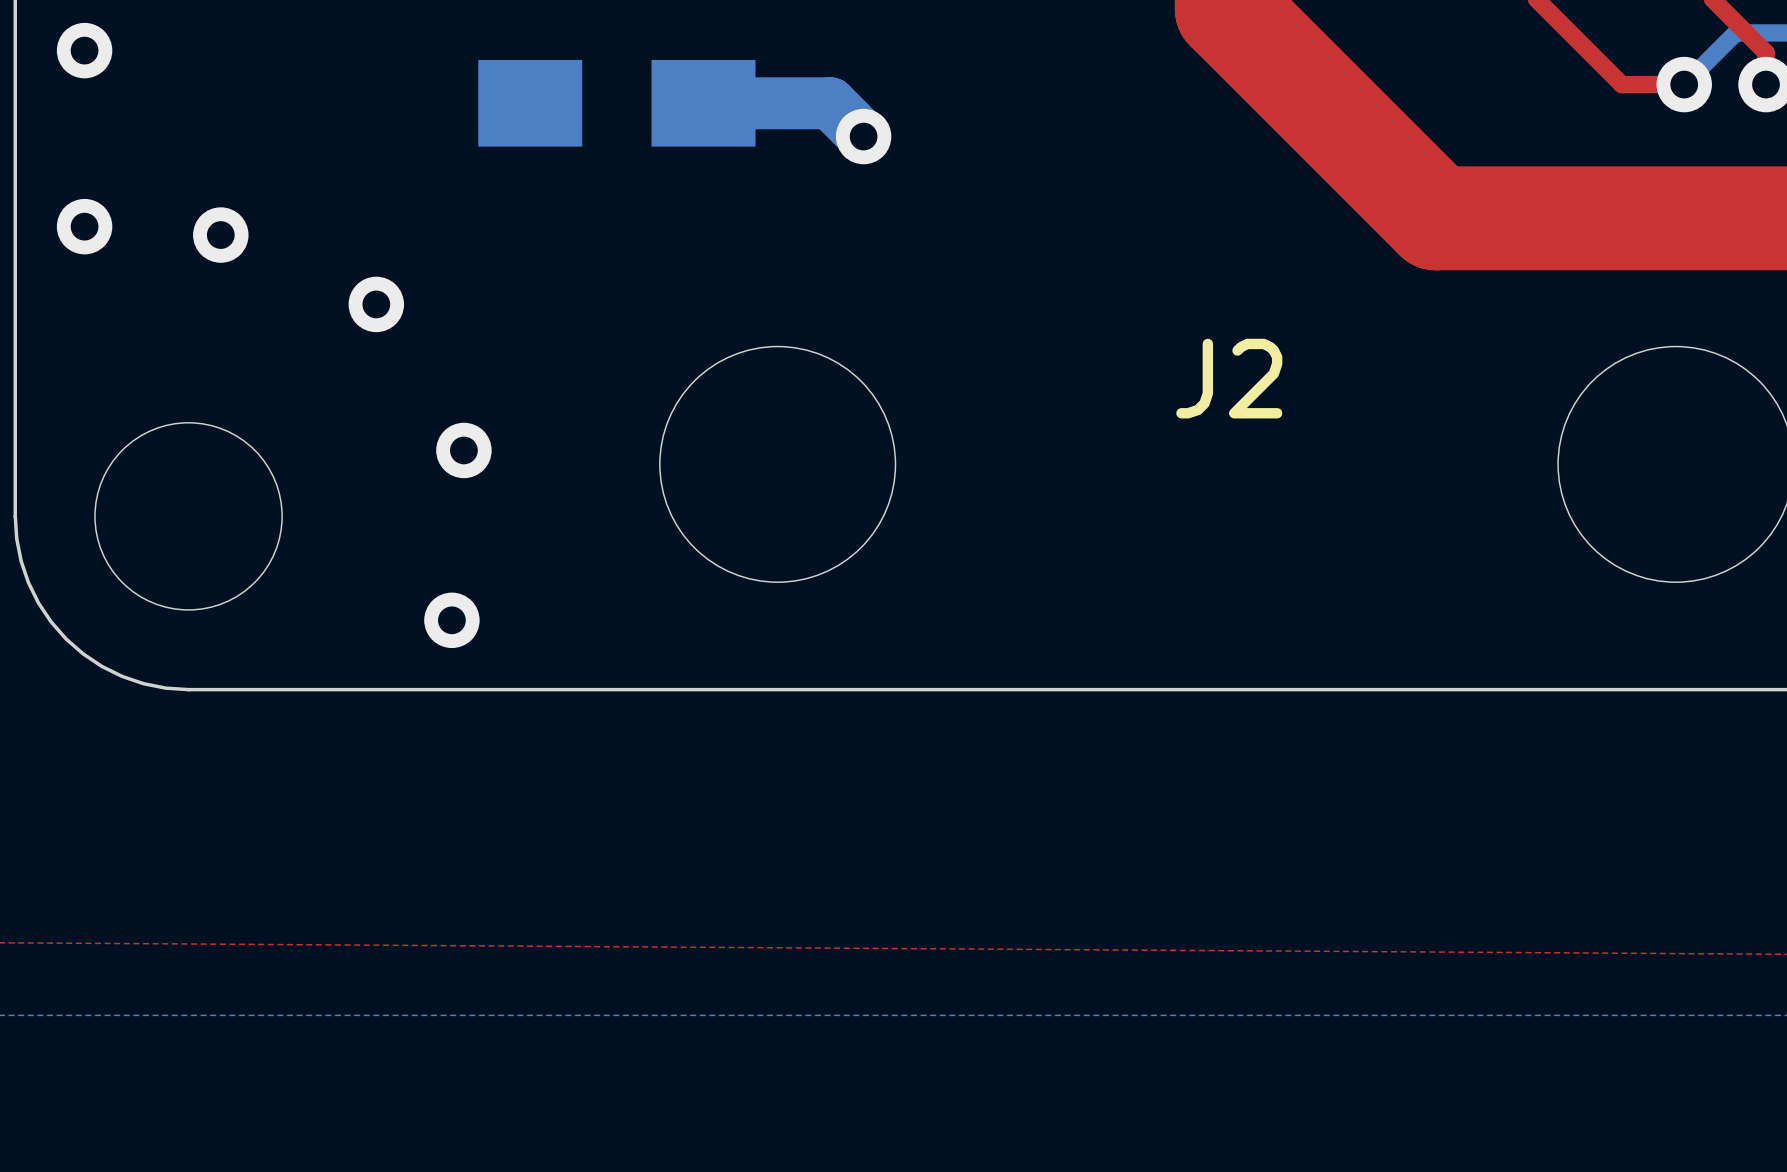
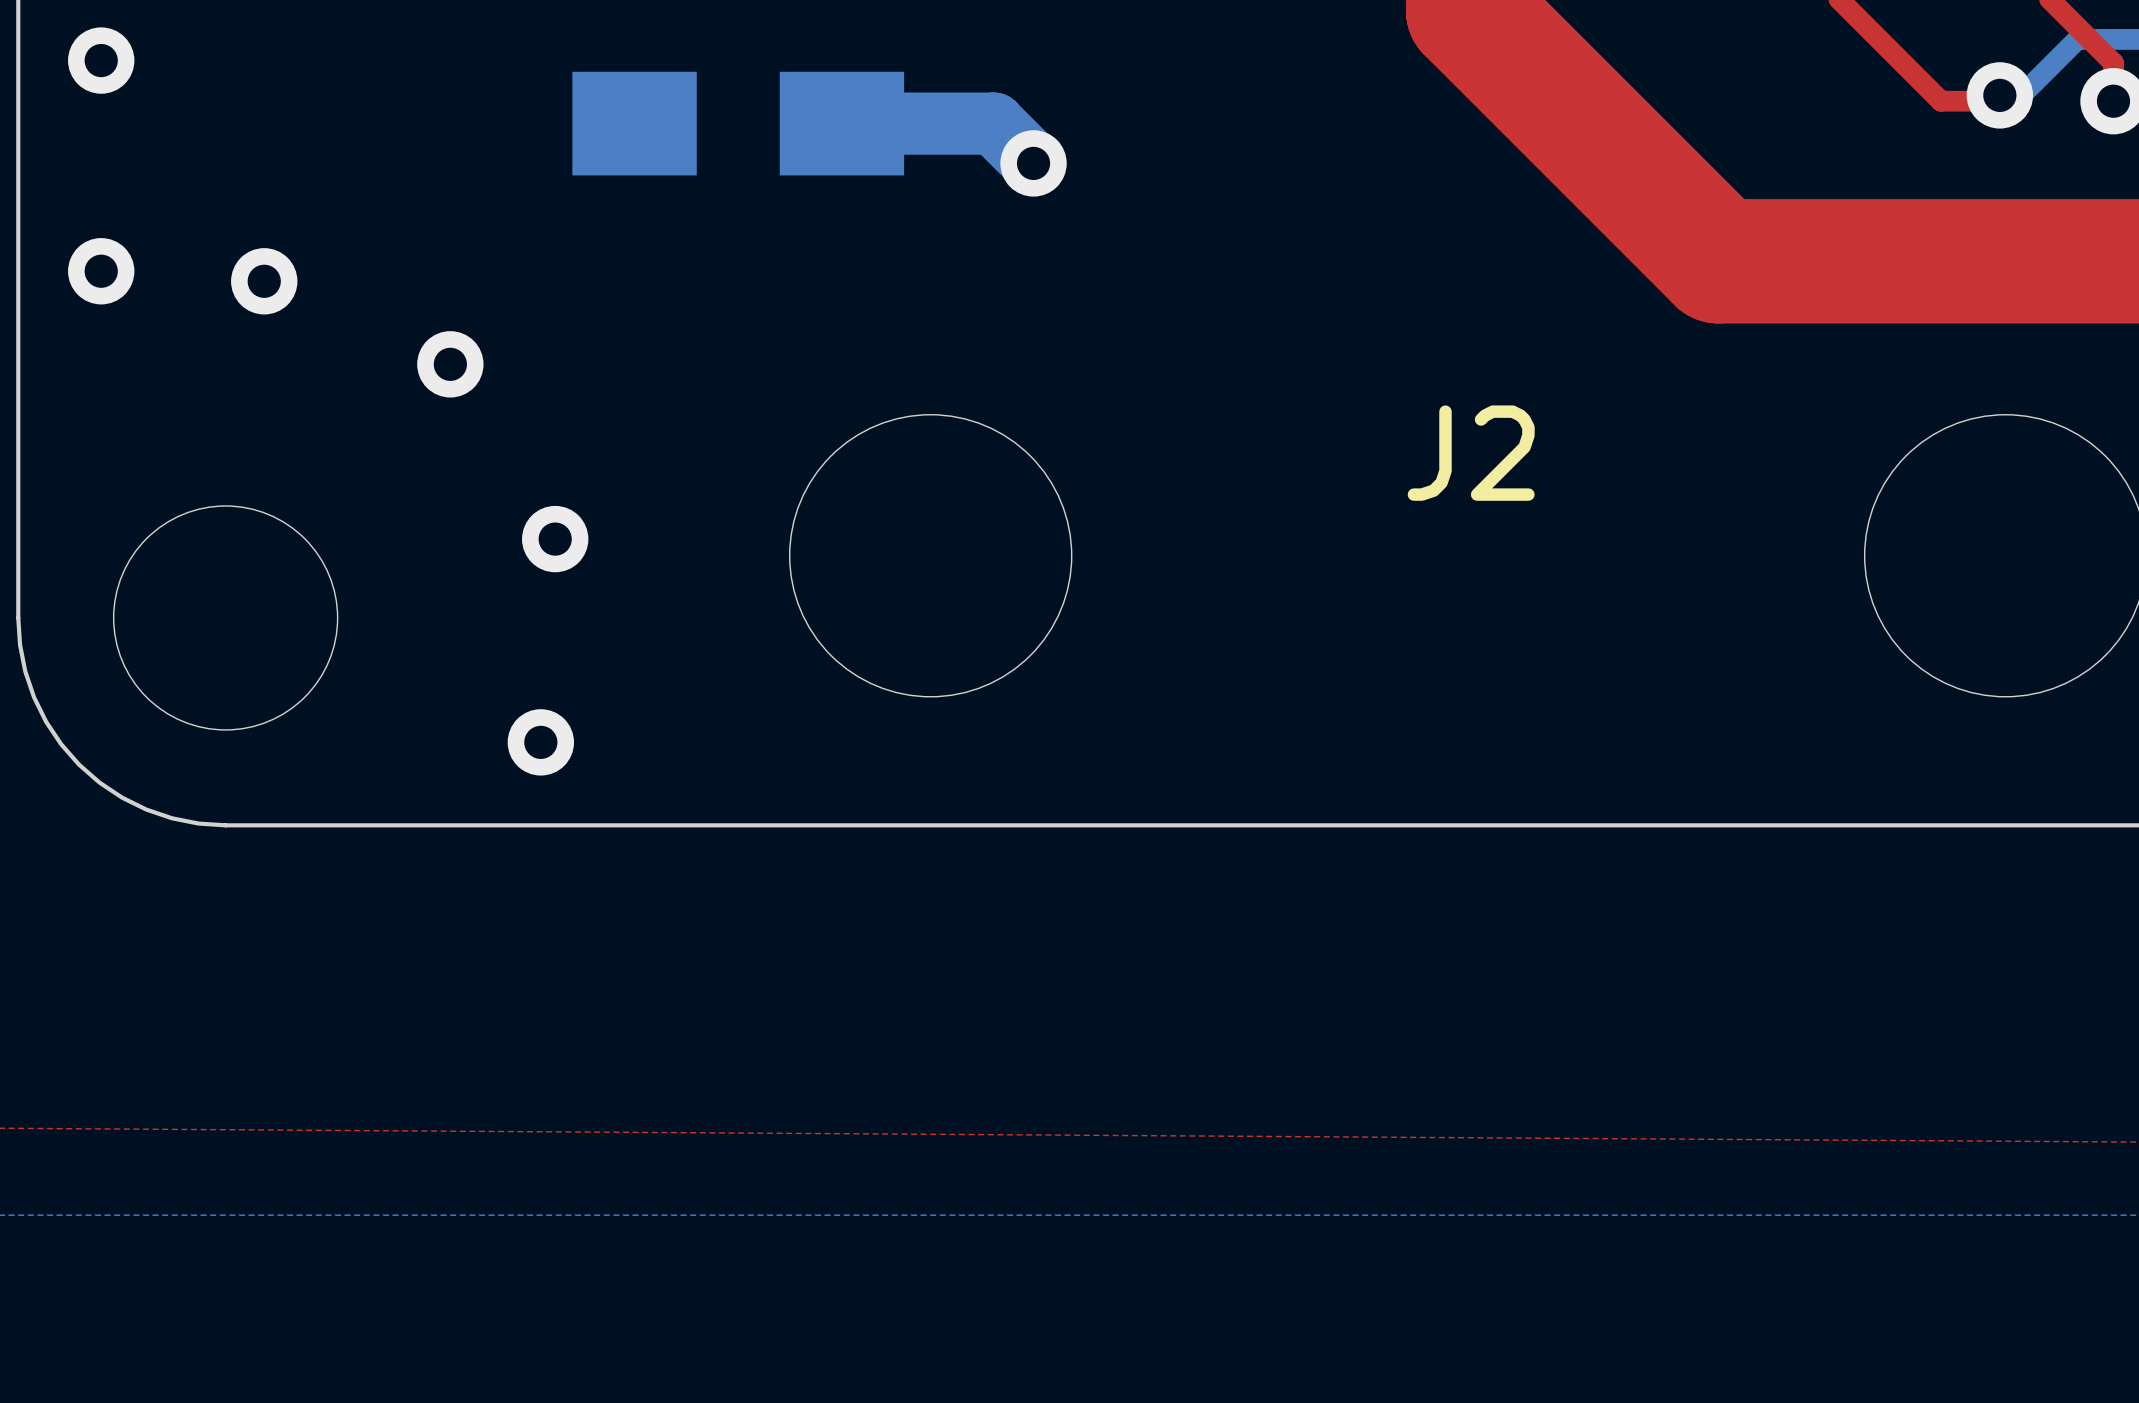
via position: (1684, 84) -> (1999, 95)

